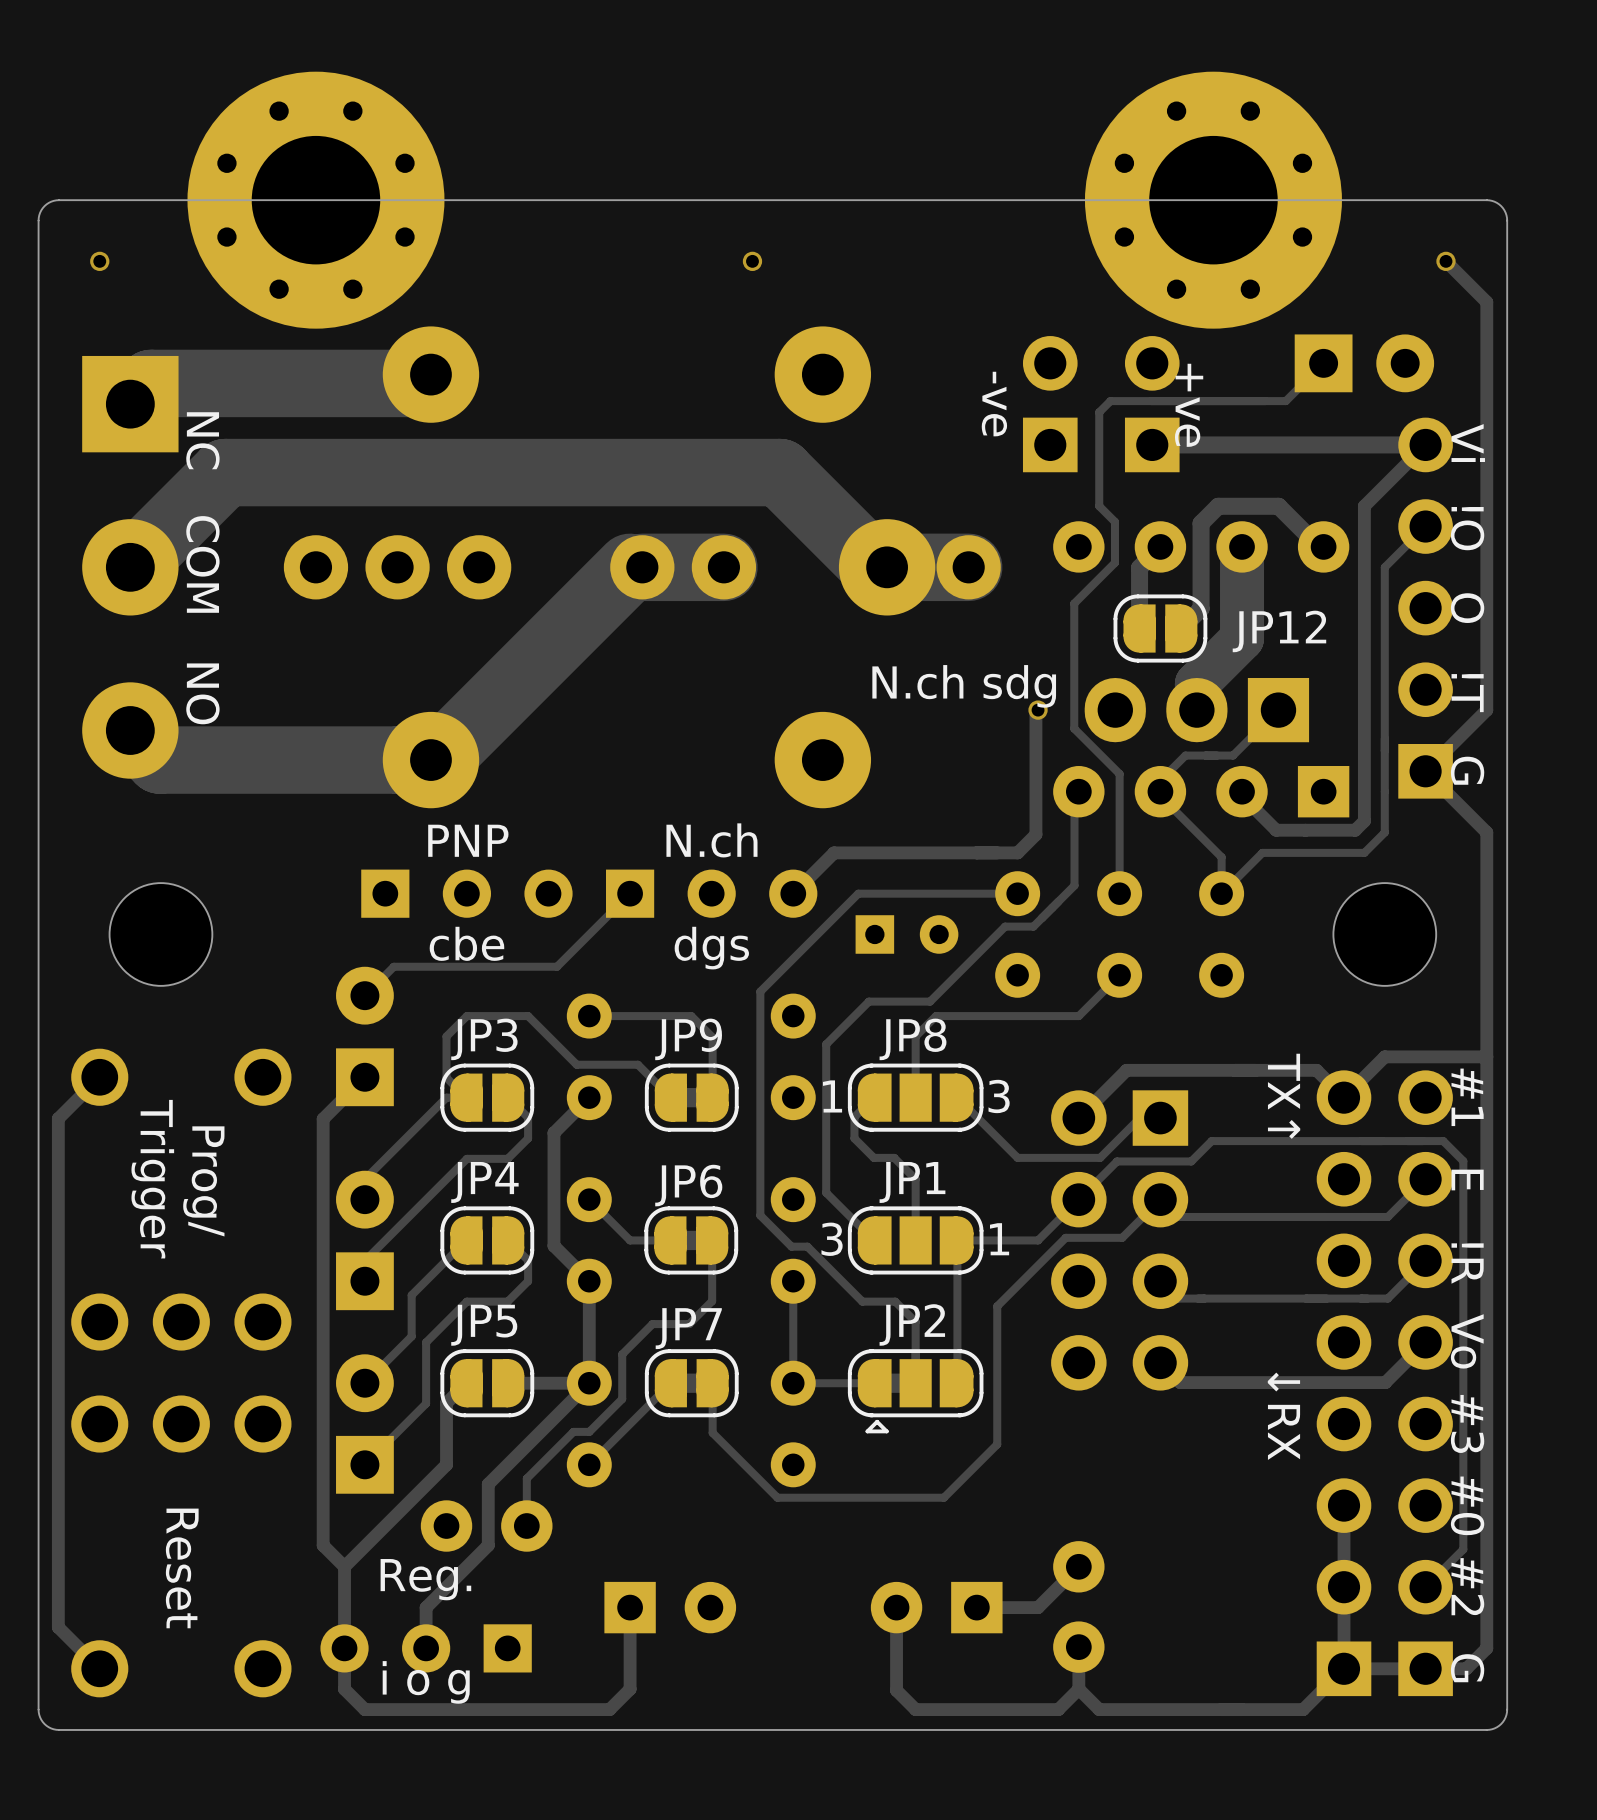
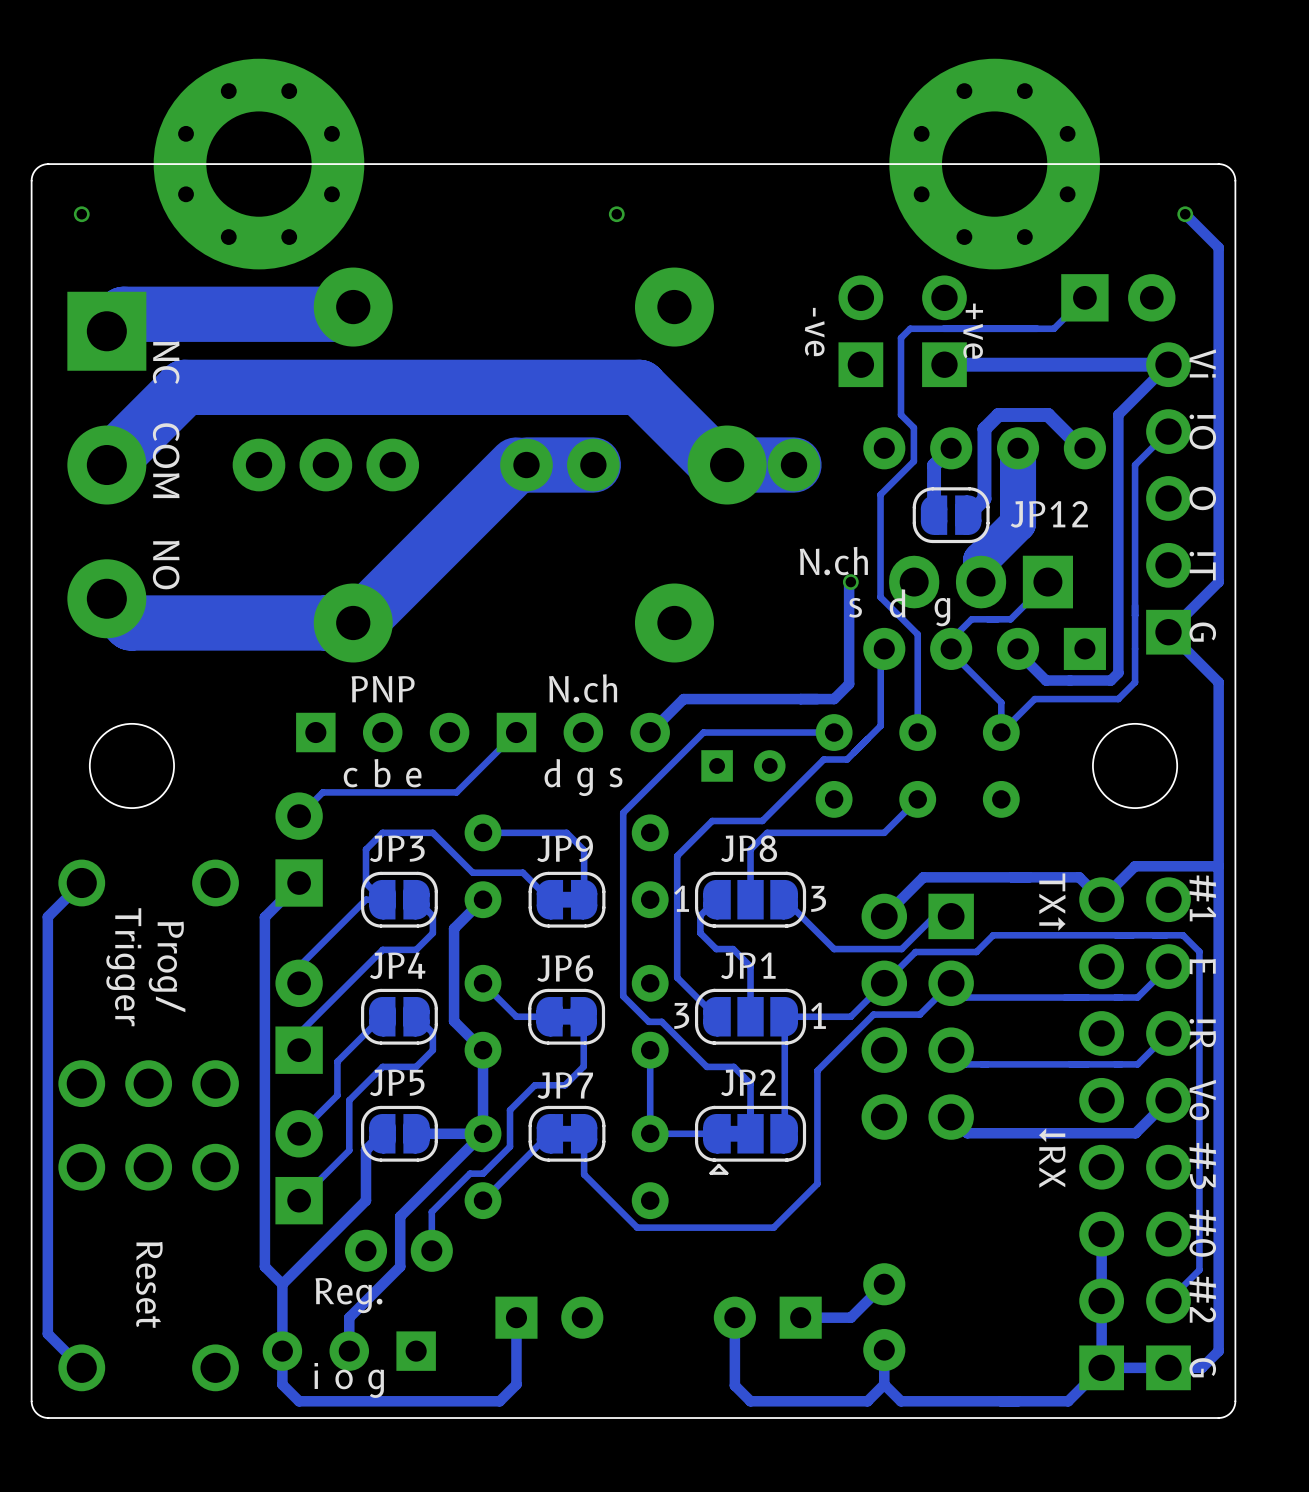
text: N.ch sdg (964, 686) -> N.ch (833, 561)
text: none -> s d g (899, 607)
text: cbe (466, 943) -> c b e (382, 773)
text: dgs (711, 948) -> d g s (583, 777)

